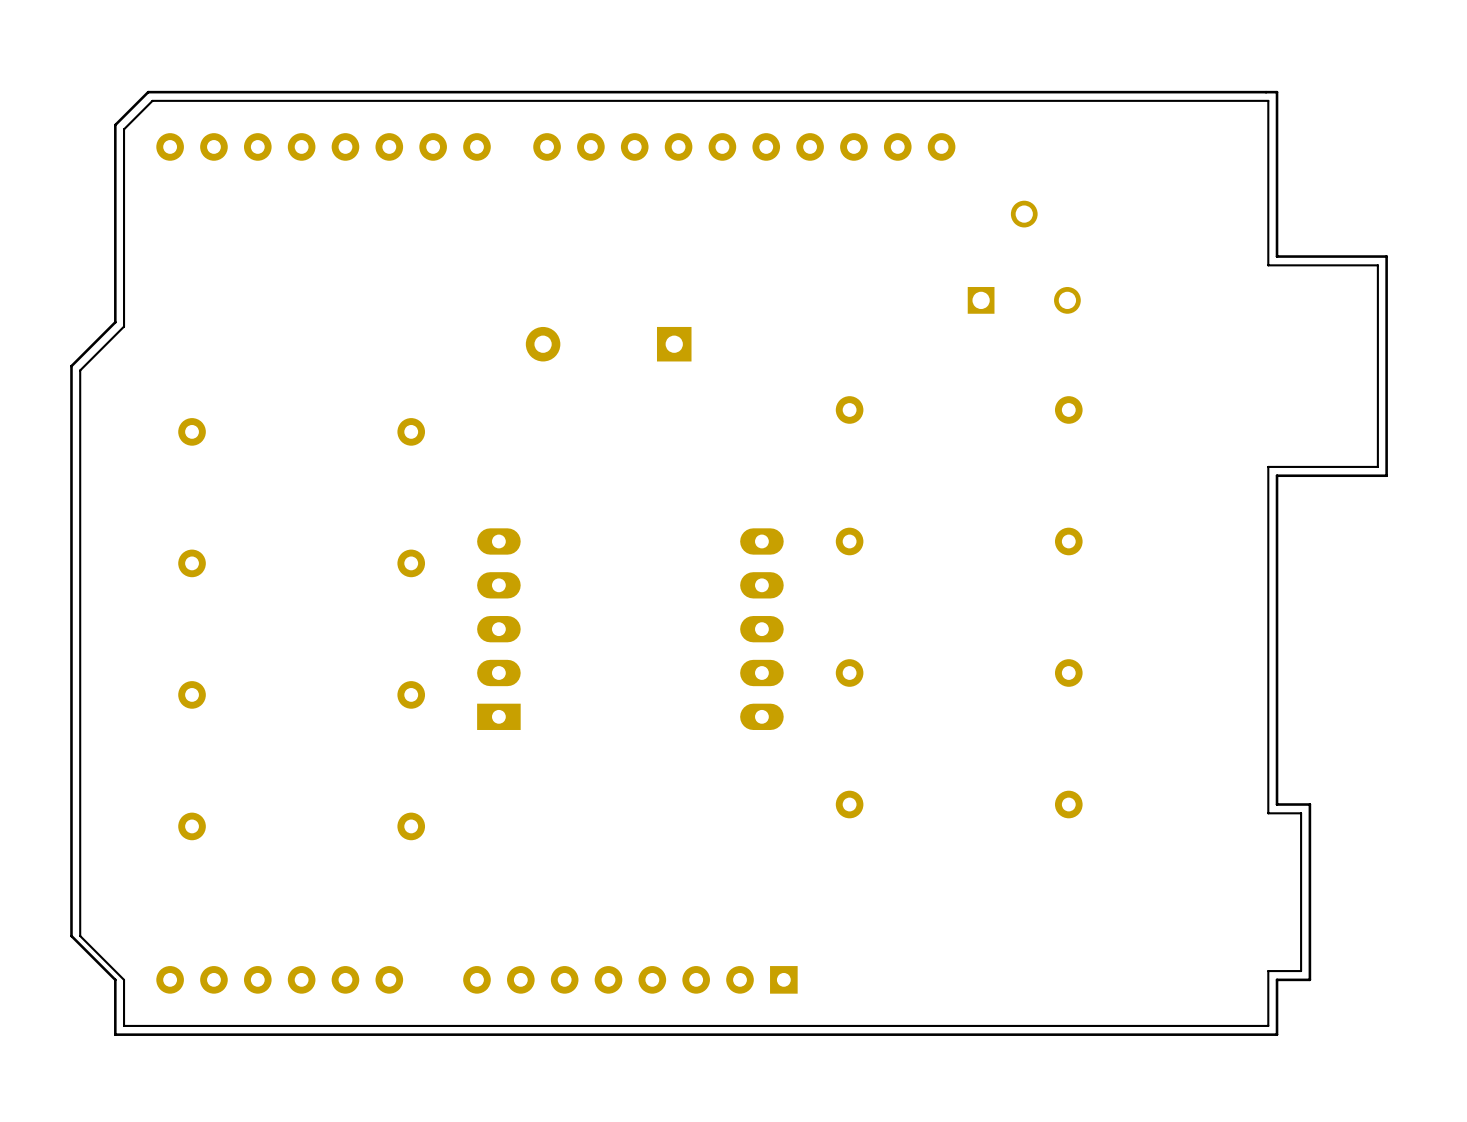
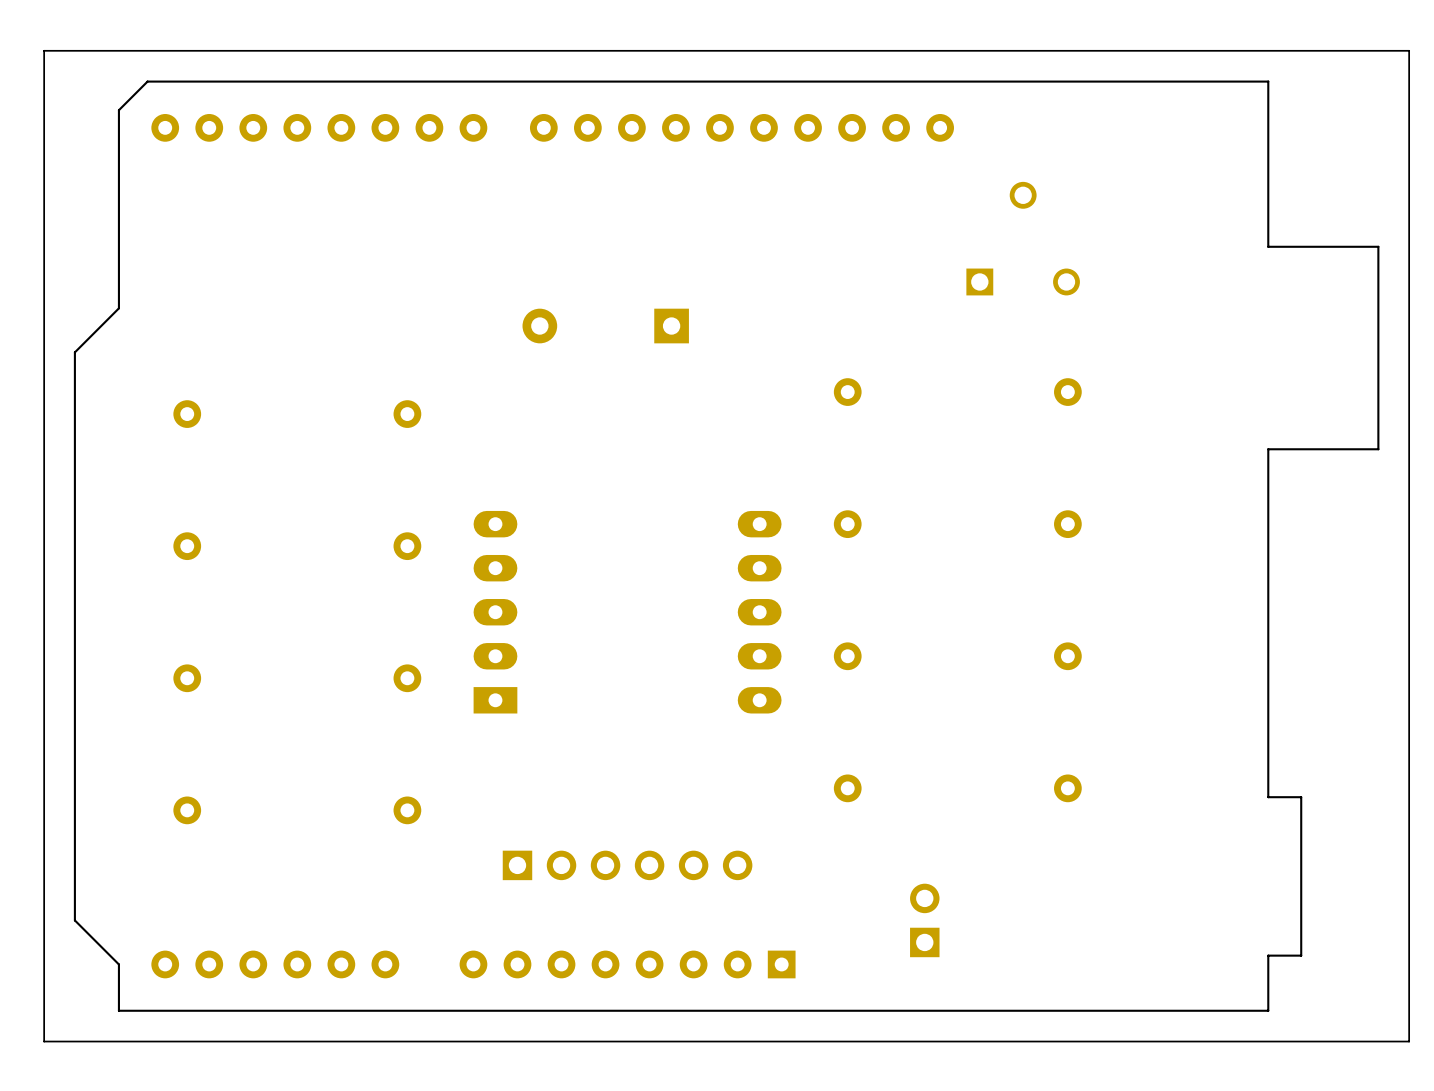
board edge: (1277, 92) (148, 92) (115, 125) (115, 322) (71, 366) (71, 936) (115, 979) (115, 1034) (1277, 1034) (1277, 979) (1309, 979) (1309, 804) (1277, 804) (1277, 475) (1386, 475) (1386, 256) (1277, 256) (1277, 92) -> (1409, 50) (1409, 1041) (44, 1041) (44, 50) (1409, 50)
part: none -> (627, 865)
part: none -> (924, 920)

